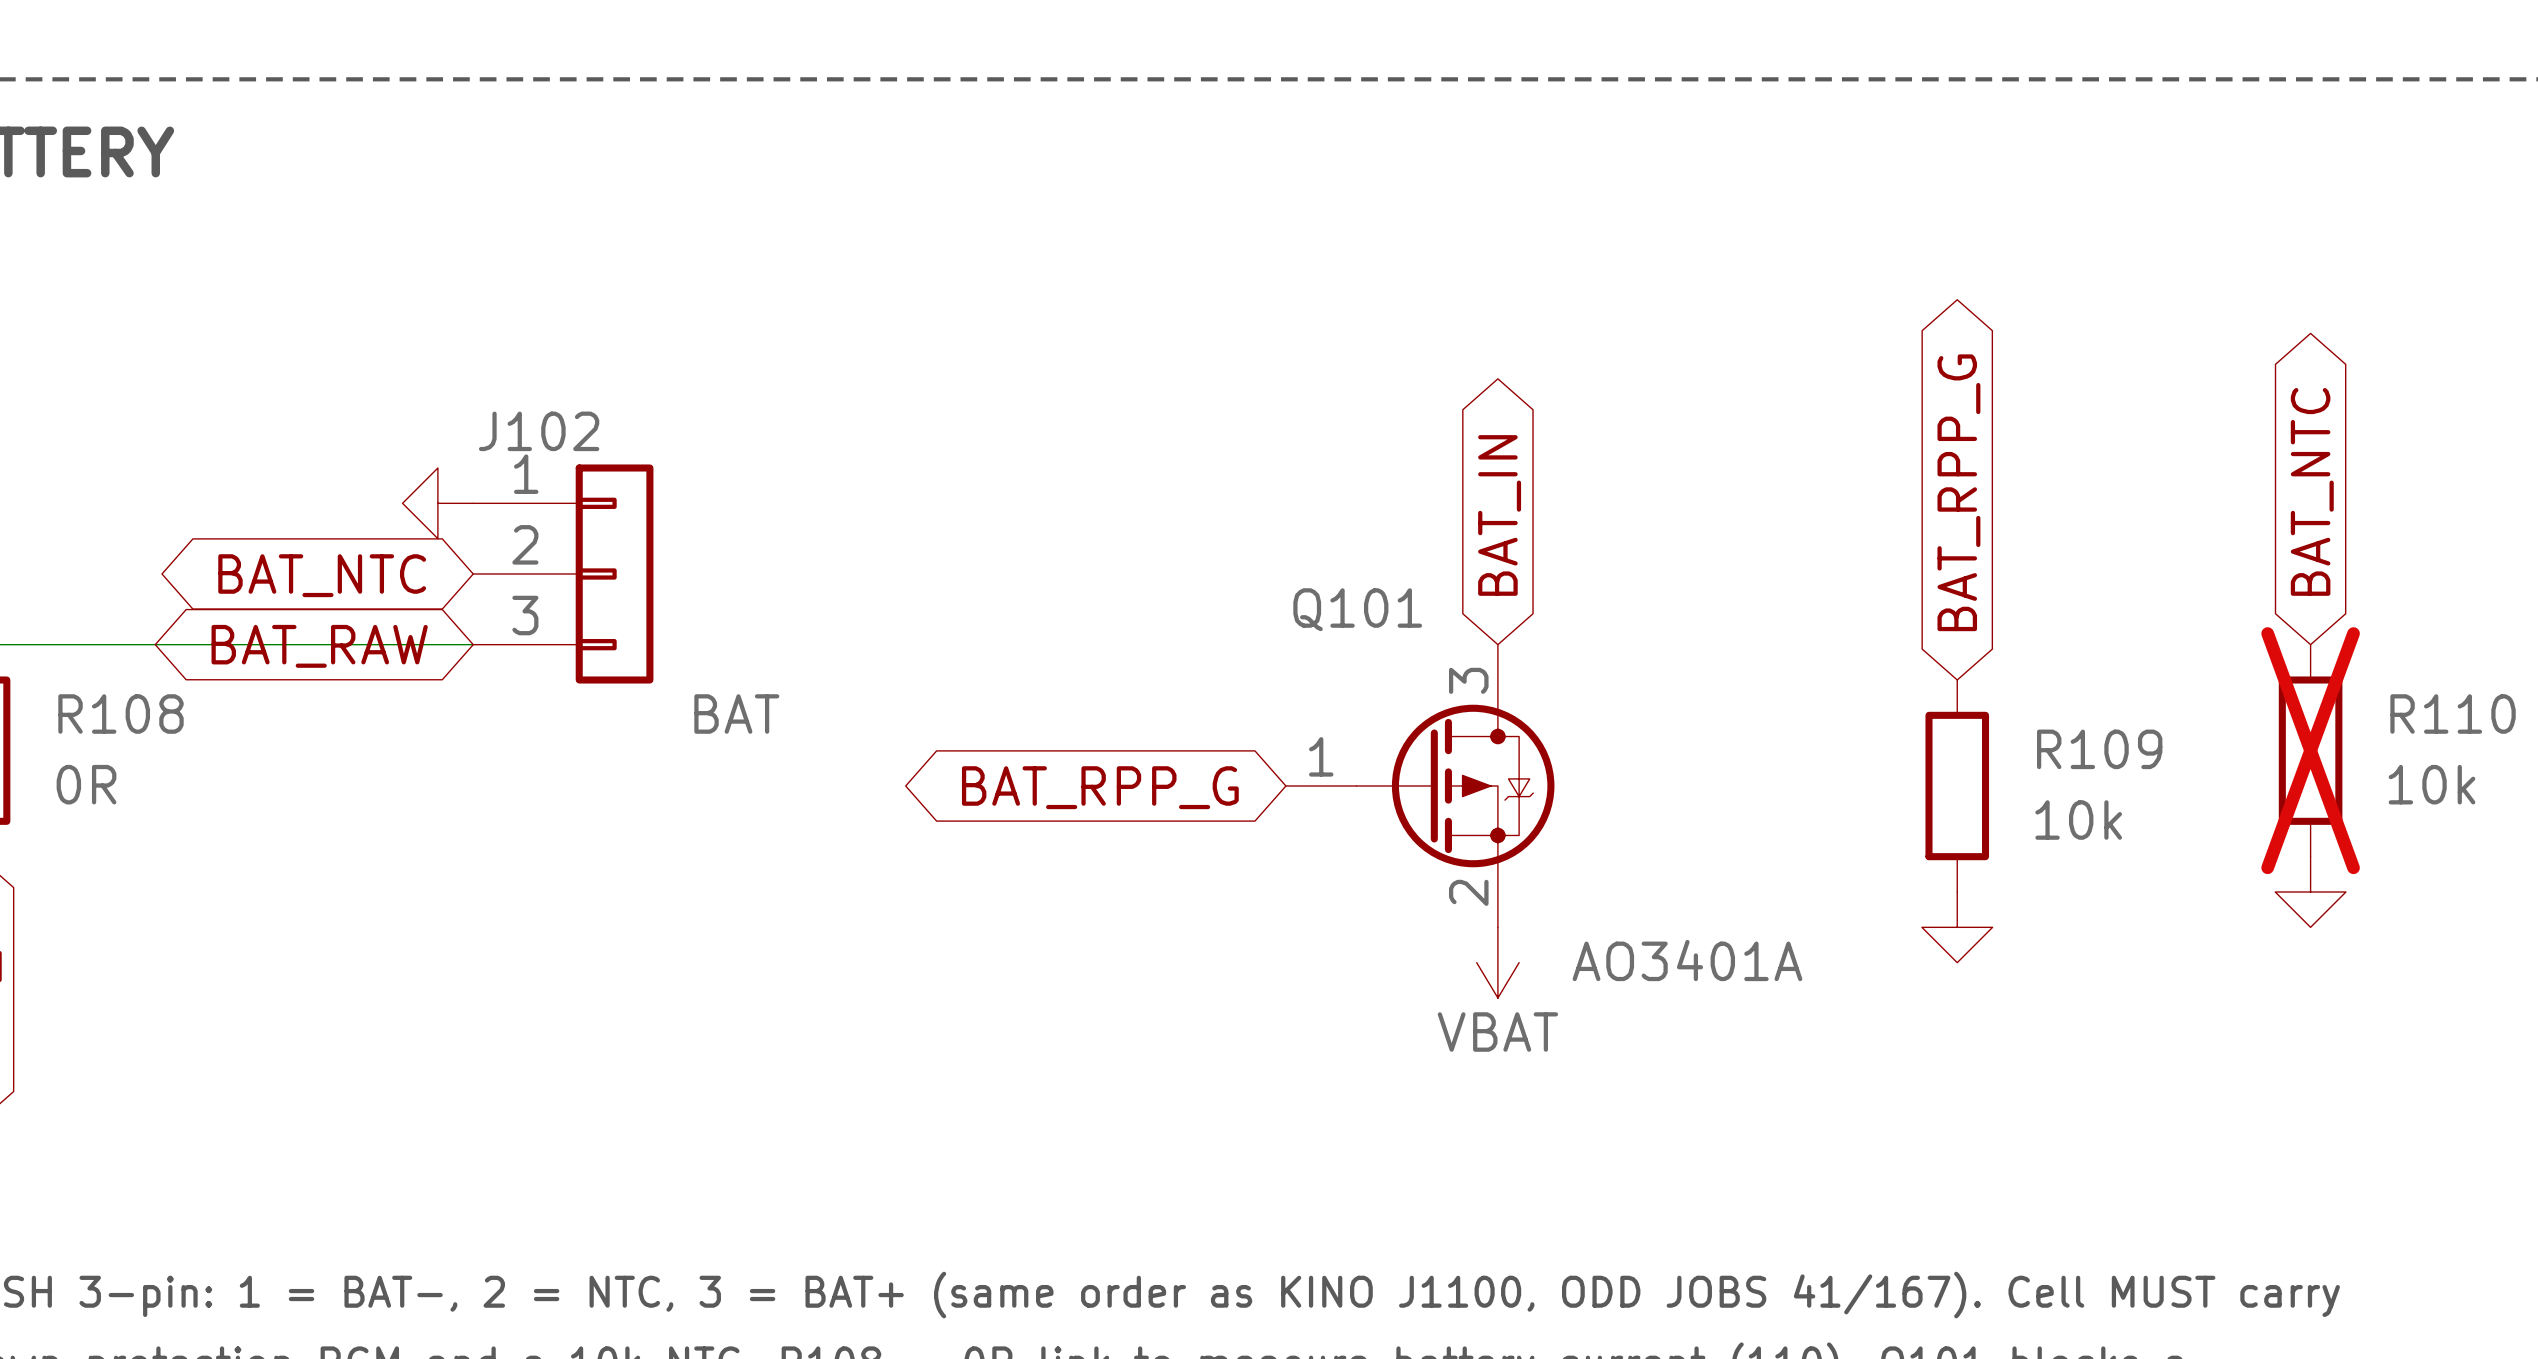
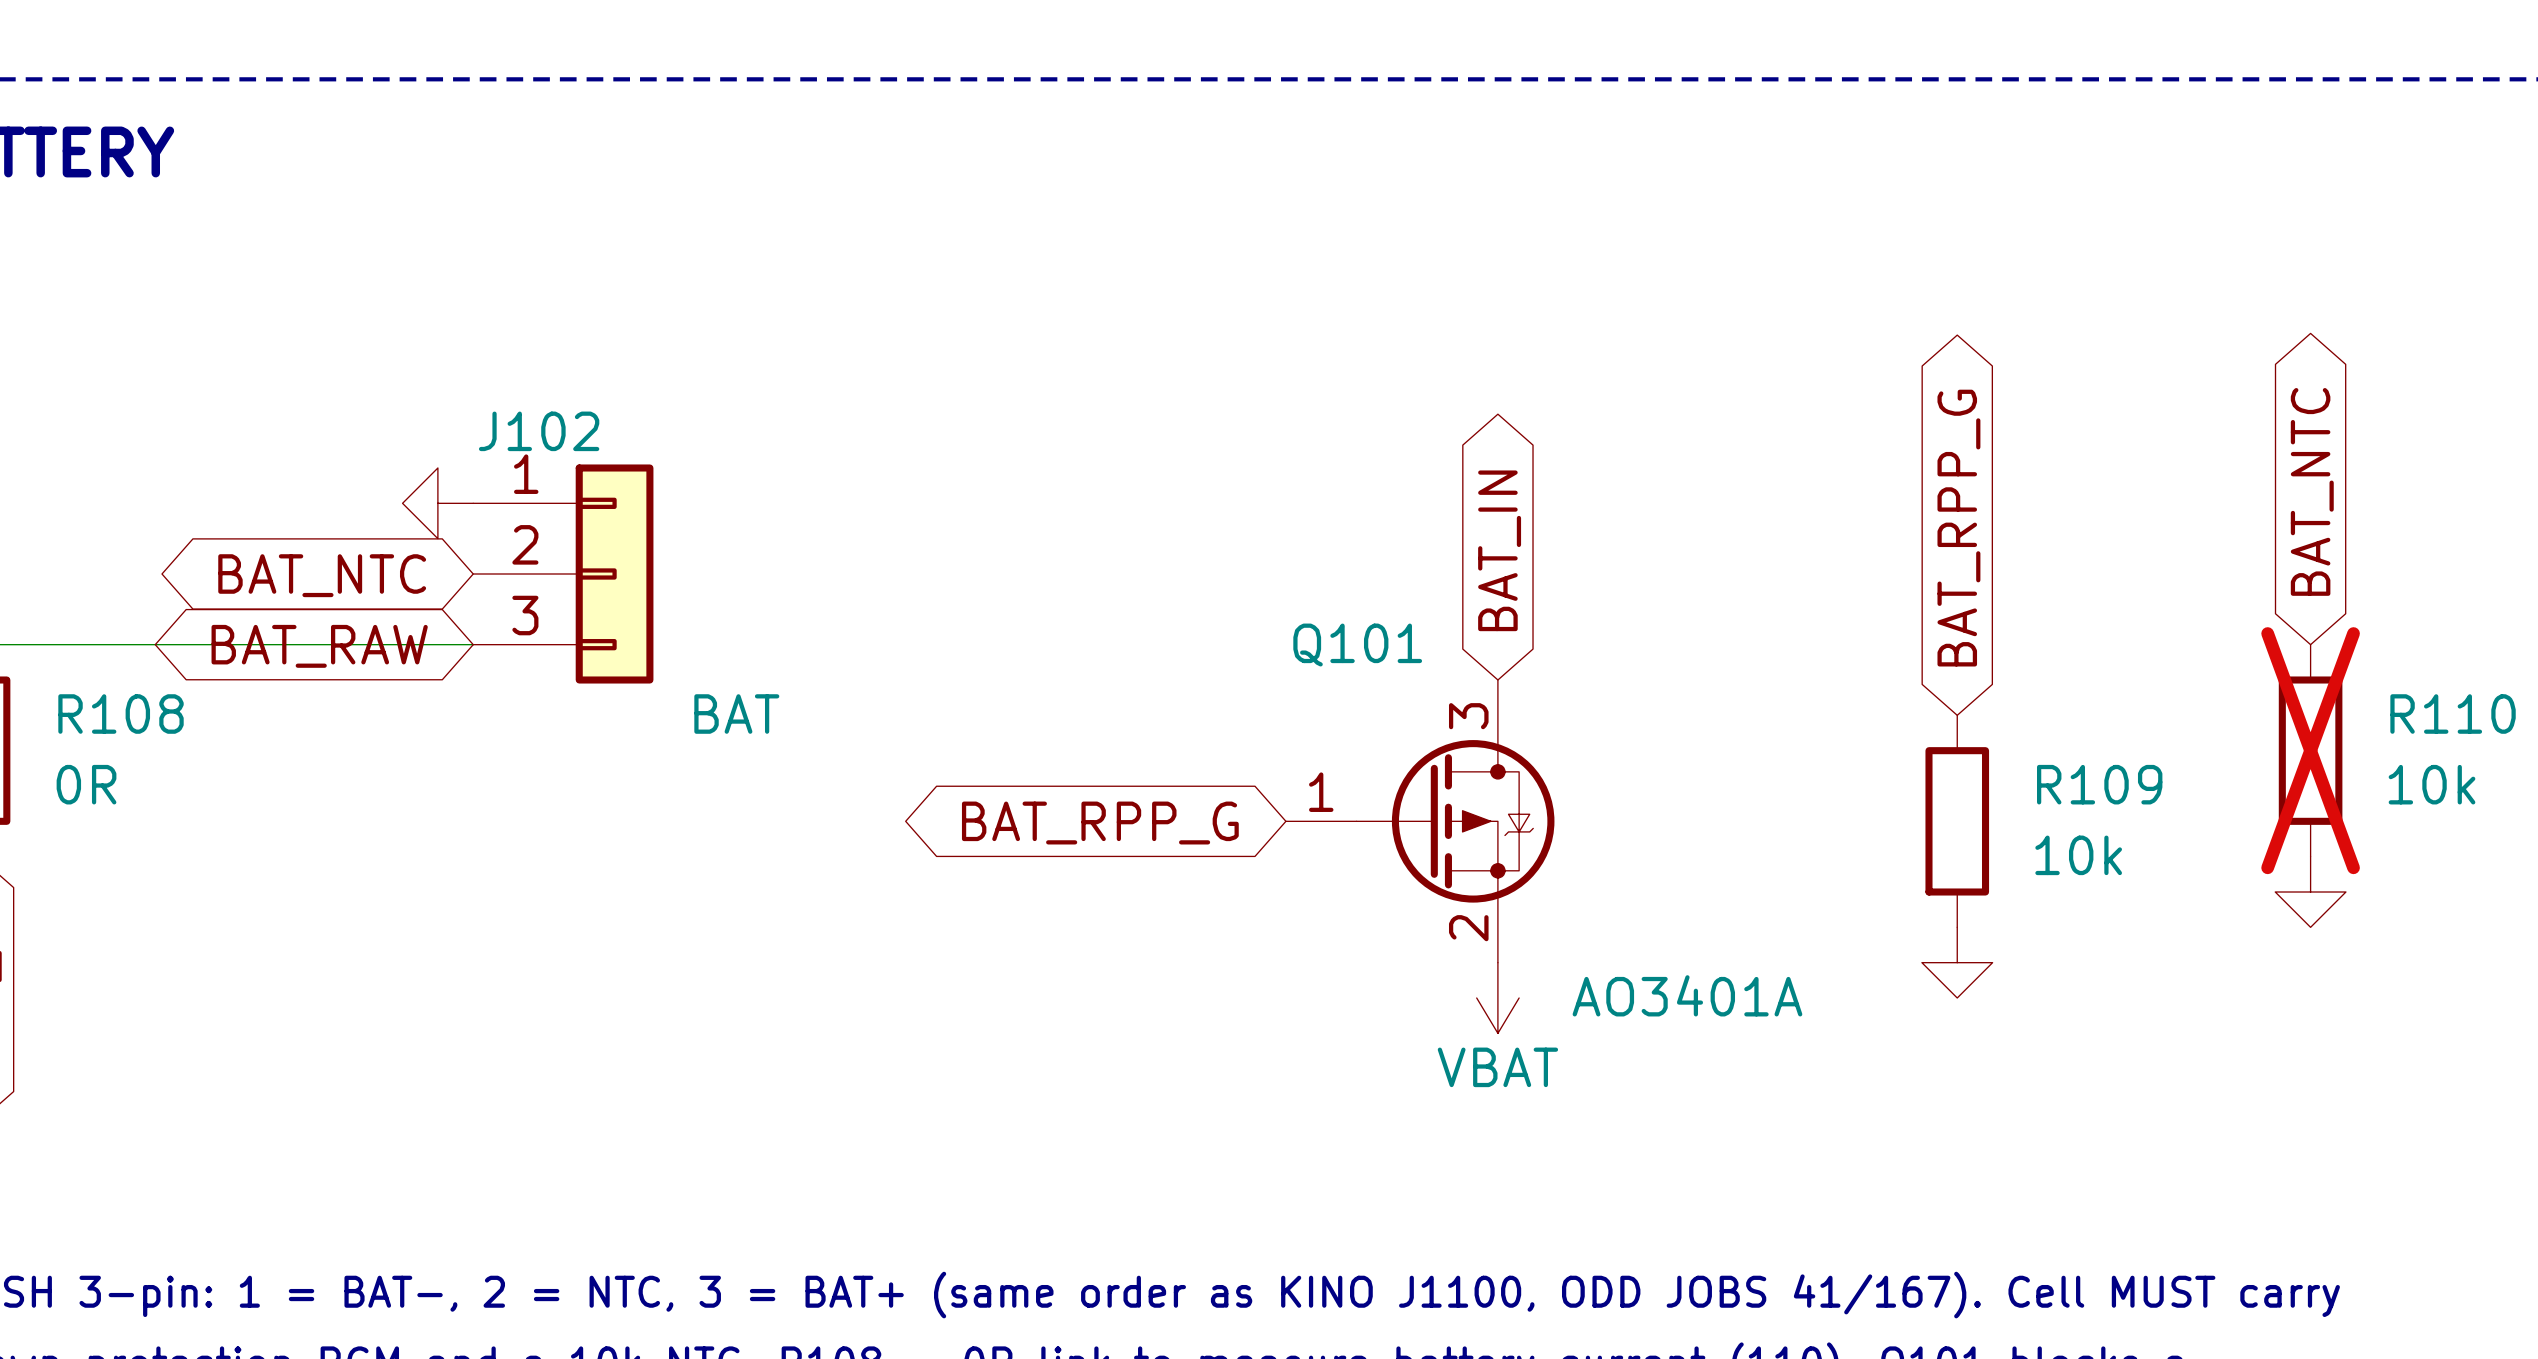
global label position: BAT_RPP_G (1958, 492) -> BAT_RPP_G (1958, 528)
global label position: BAT_IN (1499, 515) -> BAT_IN (1499, 550)
Q101 position: (1420, 786) -> (1420, 821)
R109 position: (1957, 786) -> (1957, 821)
global label position: BAT_RPP_G (1100, 787) -> BAT_RPP_G (1100, 823)
power symbol position: (1957, 927) -> (1957, 962)
power symbol position: VBAT (1497, 962) -> VBAT (1497, 998)

